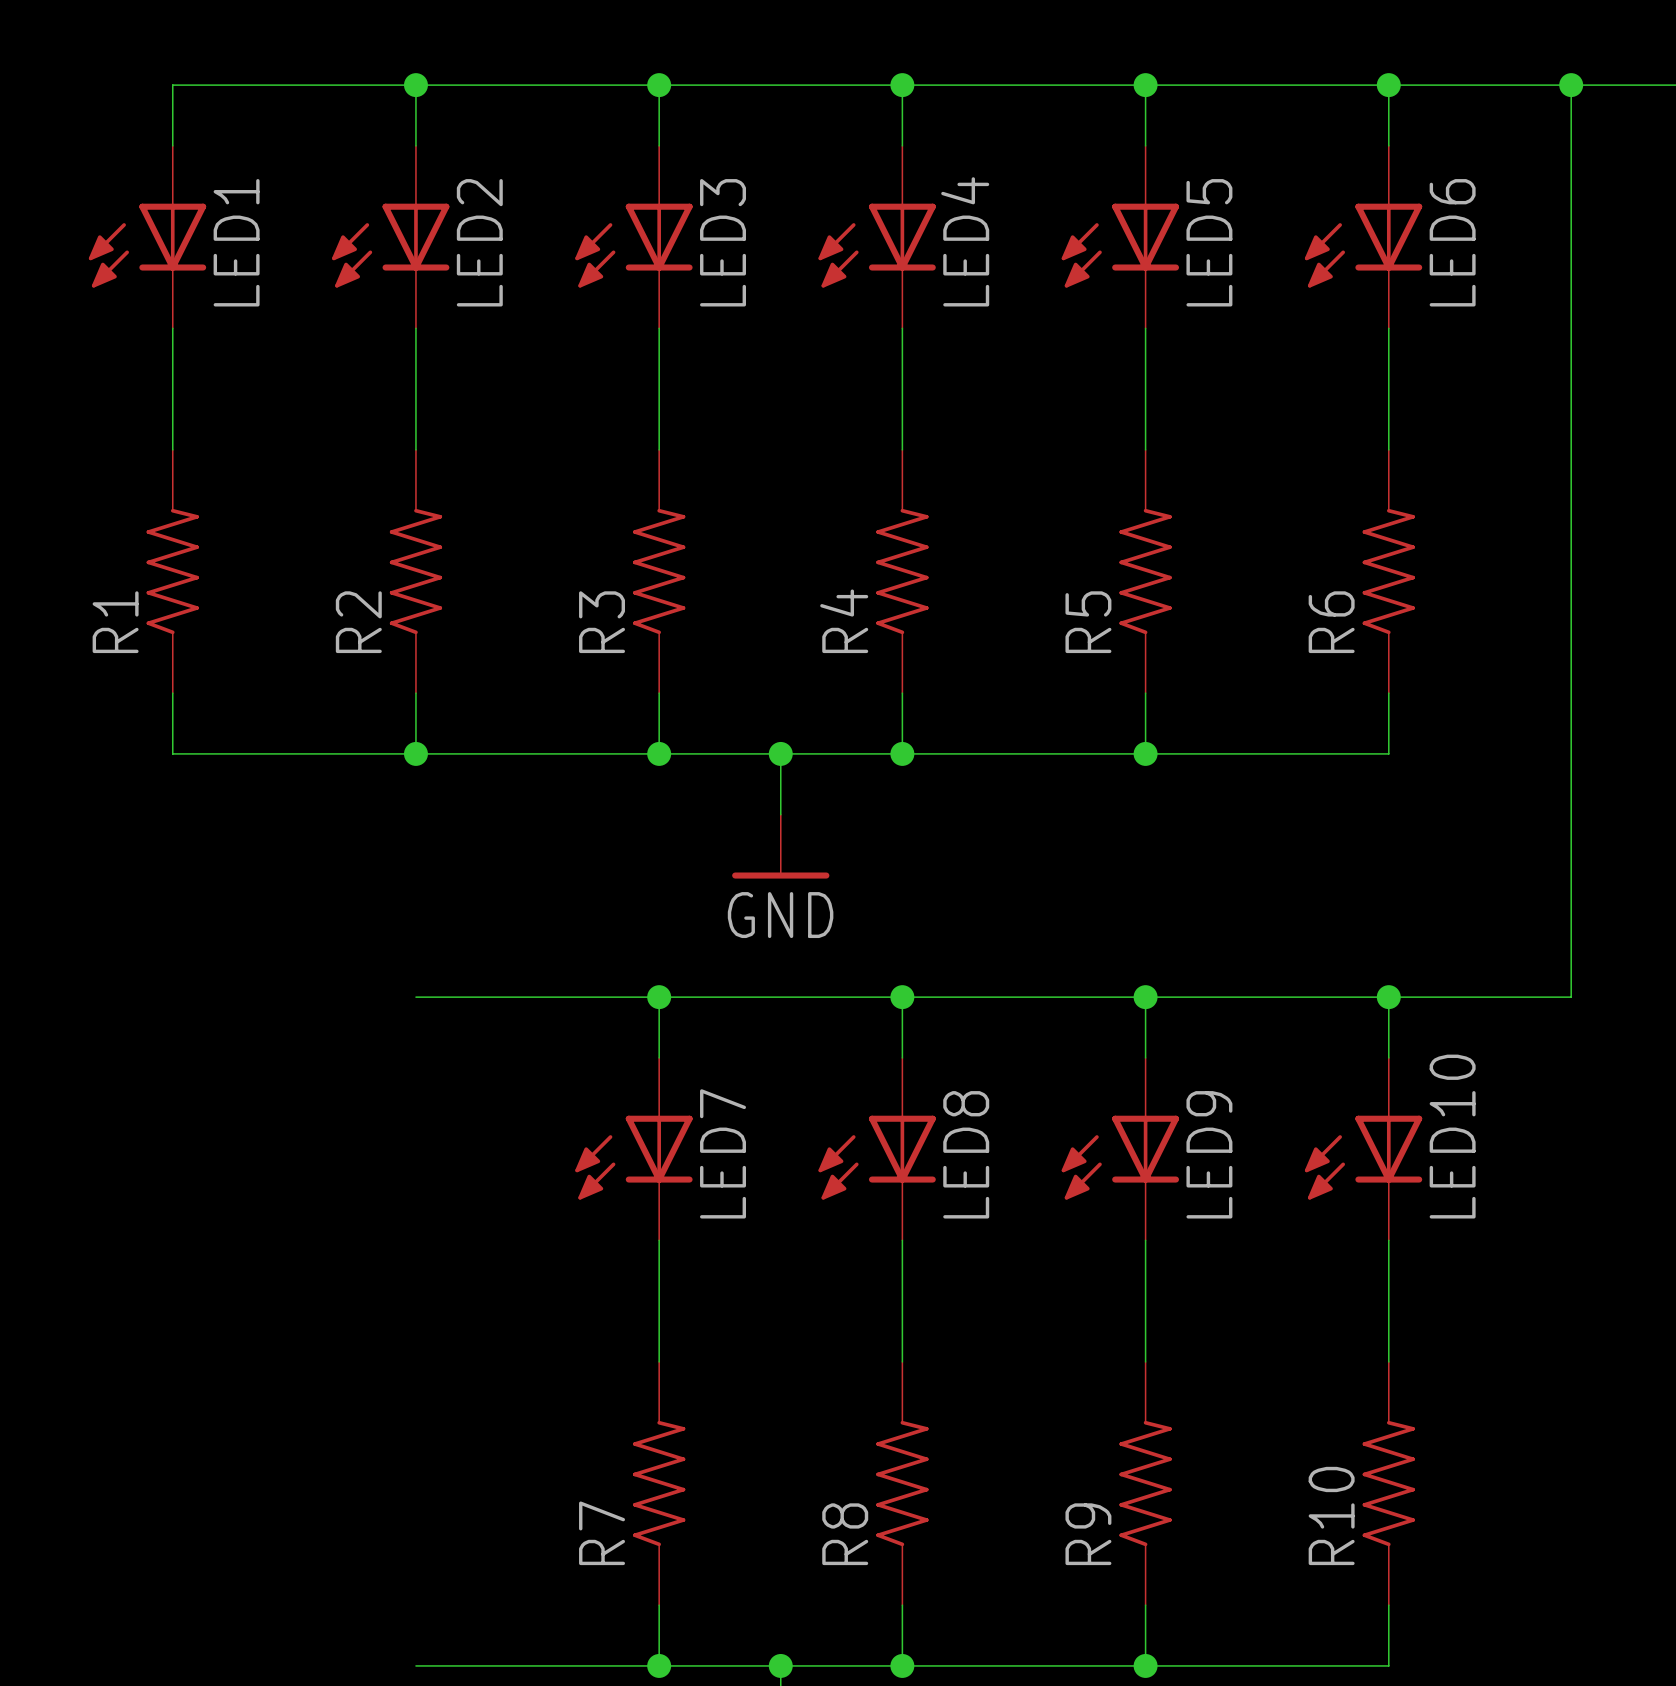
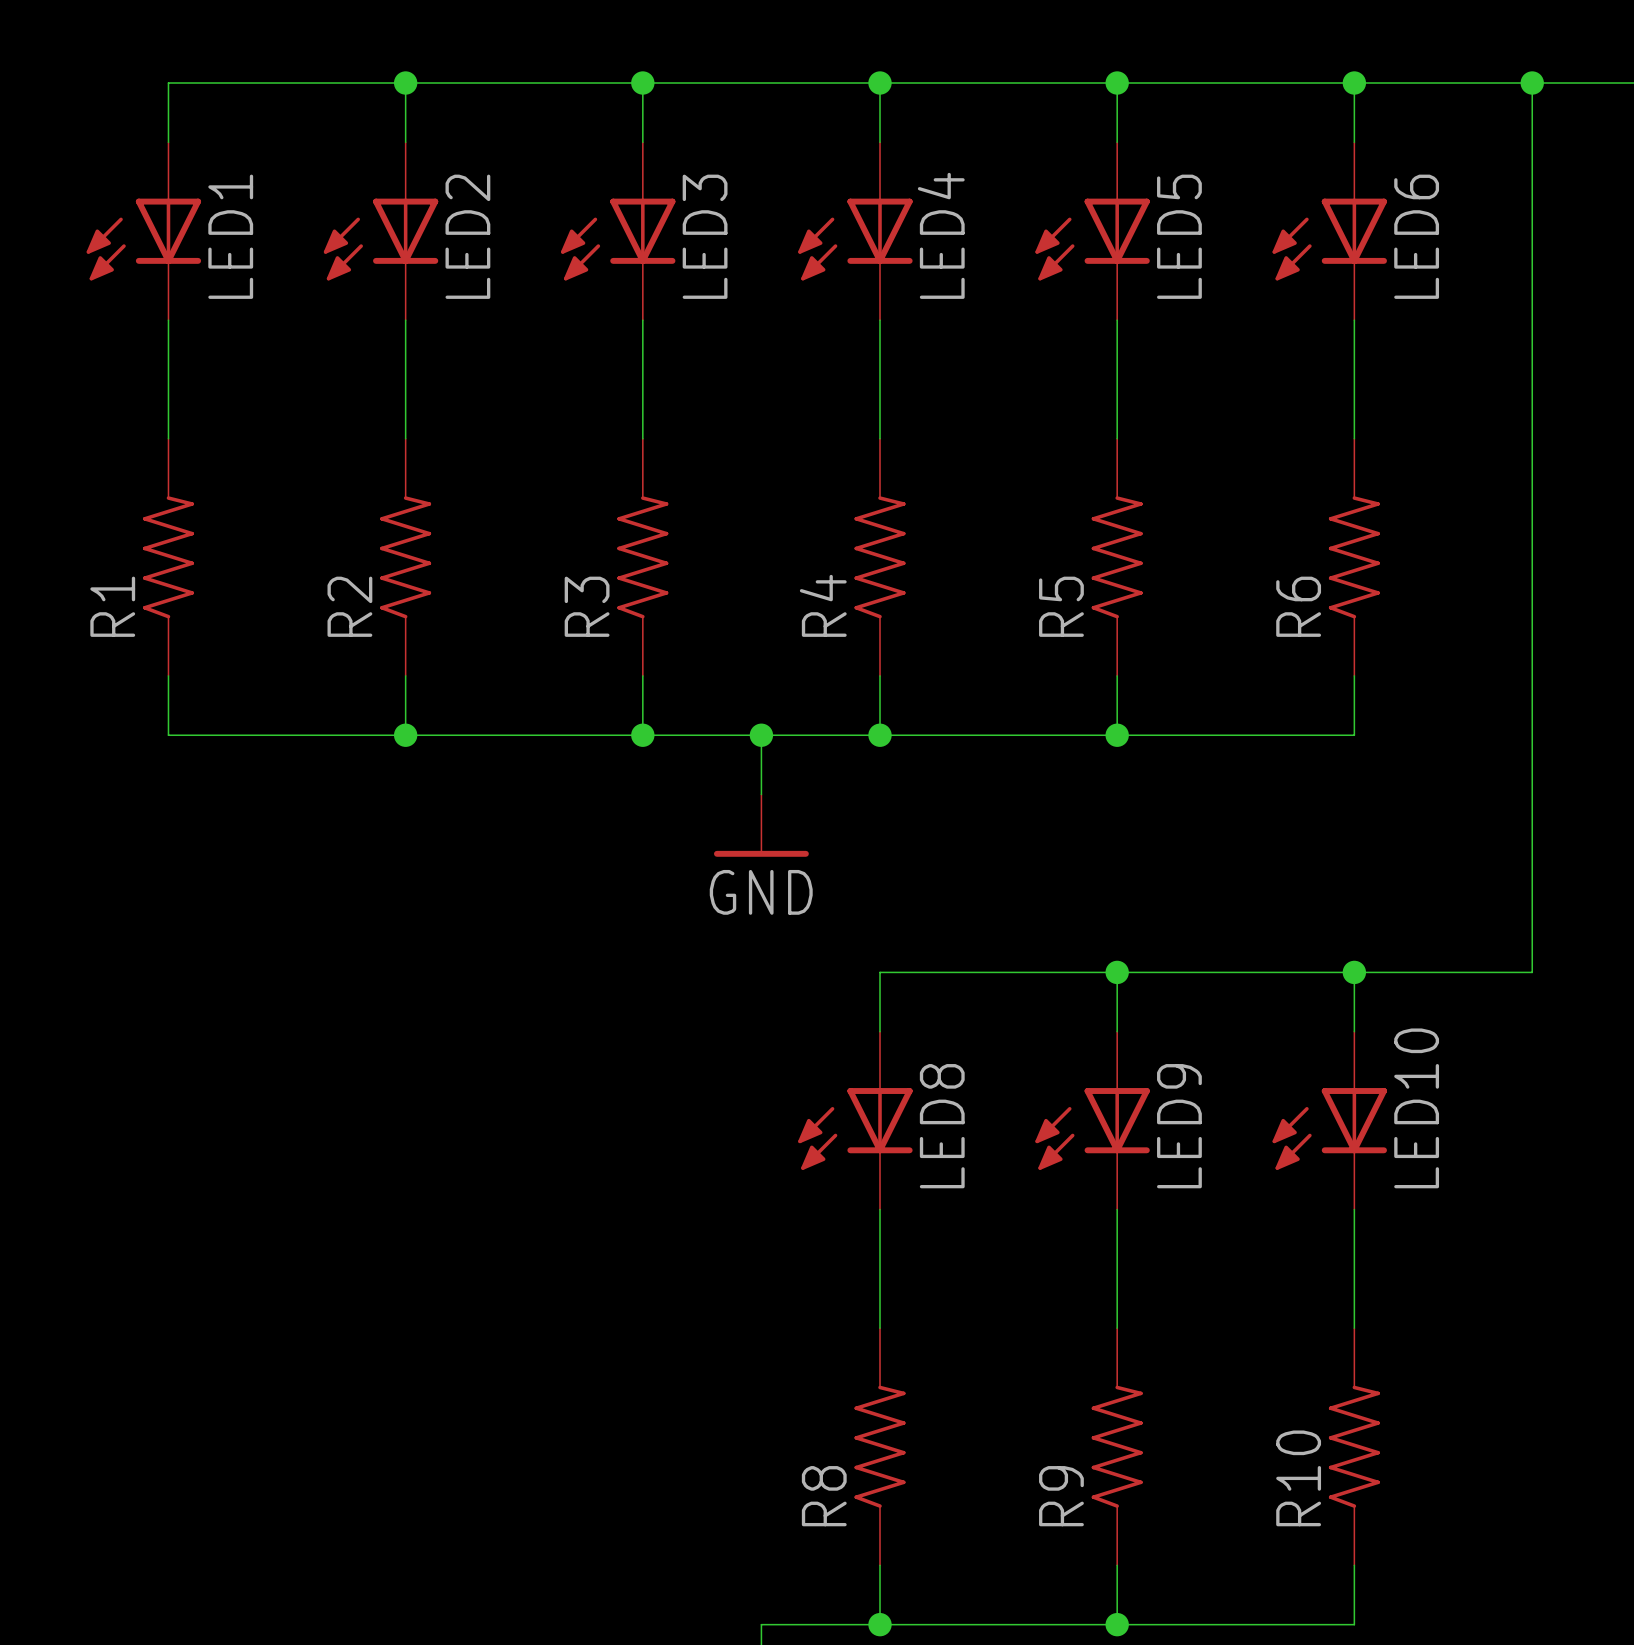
wire: (415, 997) (902, 997) -> none
wire: (659, 997) (659, 1057) -> none
junction: (659, 997) -> none
junction: (902, 997) -> none
LED7: (633, 1149) -> none
wire: (659, 1240) (659, 1361) -> none
R7: (659, 1483) -> none
wire: (659, 1605) (659, 1665) -> none
wire: (415, 1665) (780, 1665) -> none
junction: (659, 1665) -> none
junction: (780, 1665) -> none

